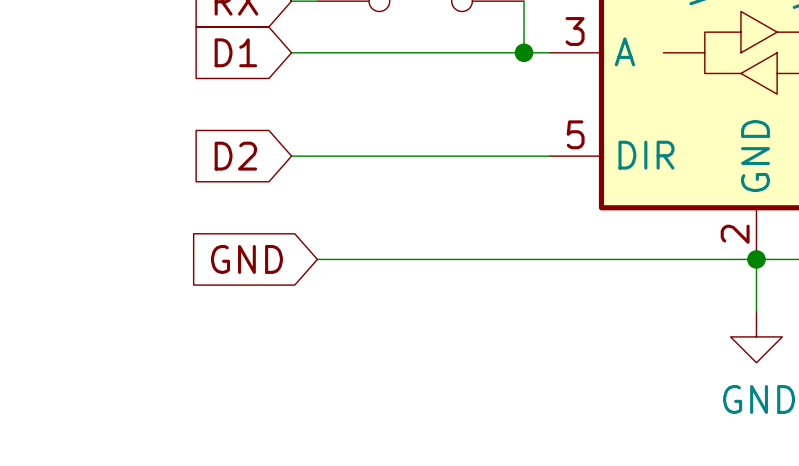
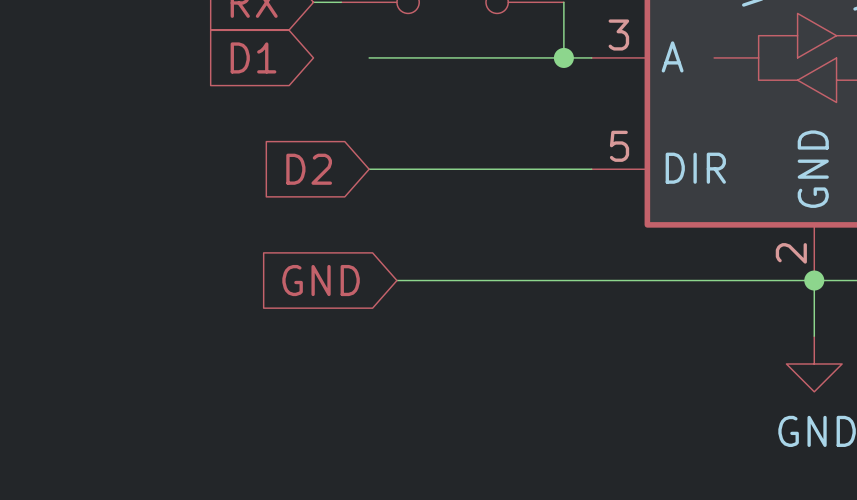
wire: (291, 52) (343, 52) -> none
global label position: D2 (235, 156) -> D2 (309, 169)
wire: (291, 156) (343, 156) -> none
global label position: GND (246, 259) -> GND (321, 280)
wire: (317, 259) (369, 259) -> none

